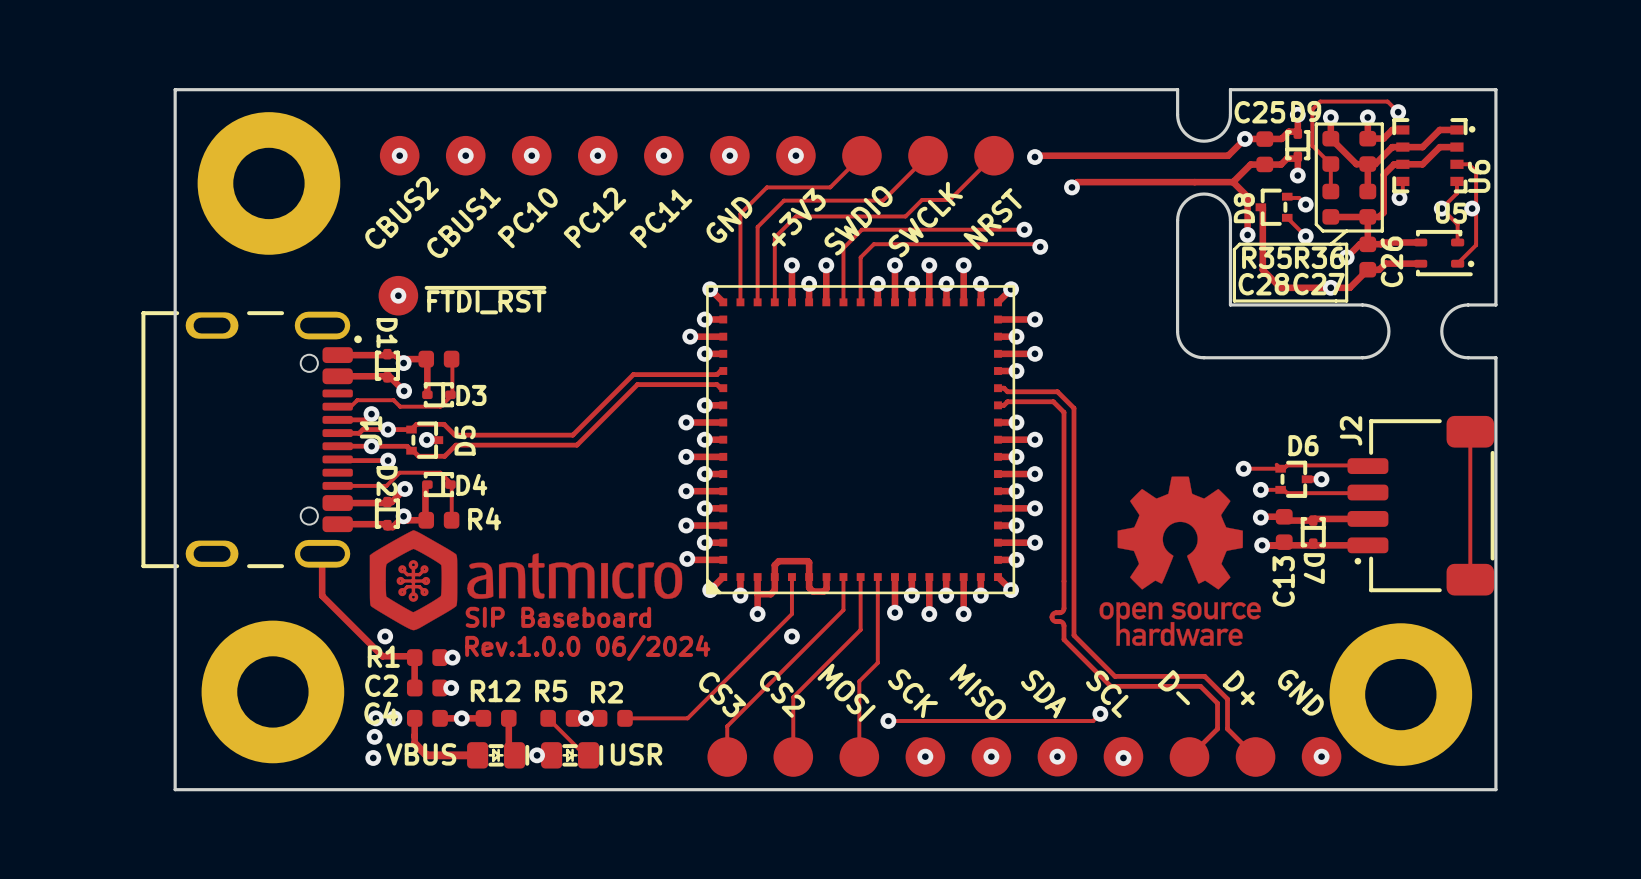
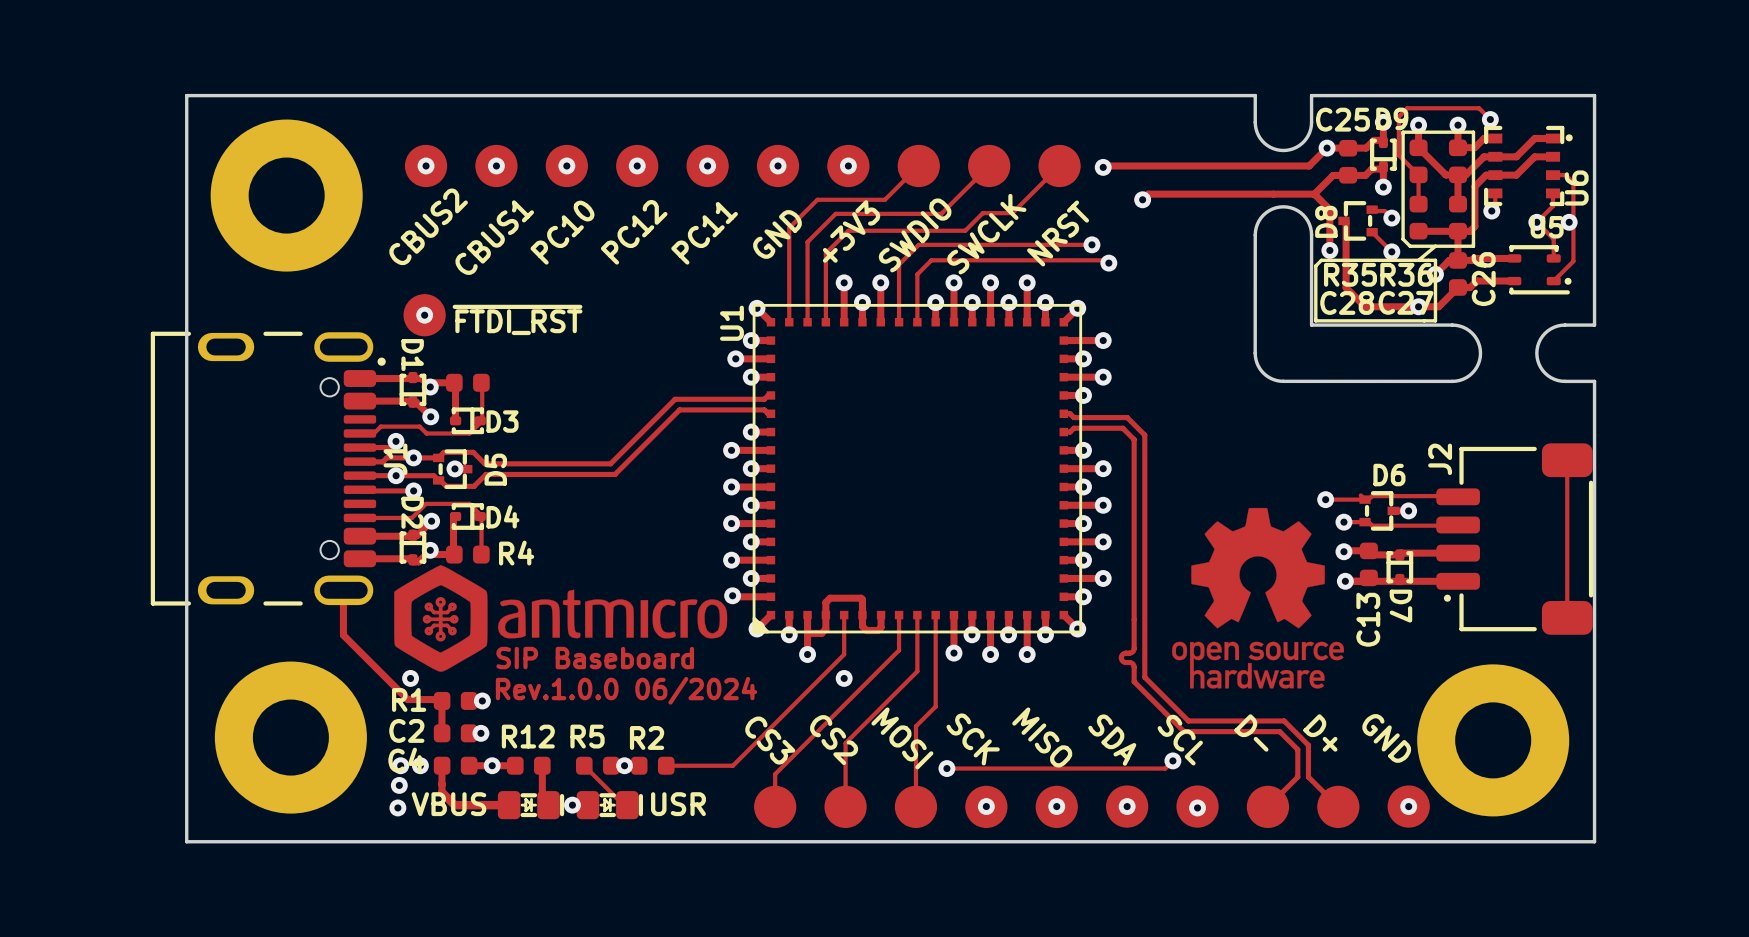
U1 name: none -> U1 (731, 323)

